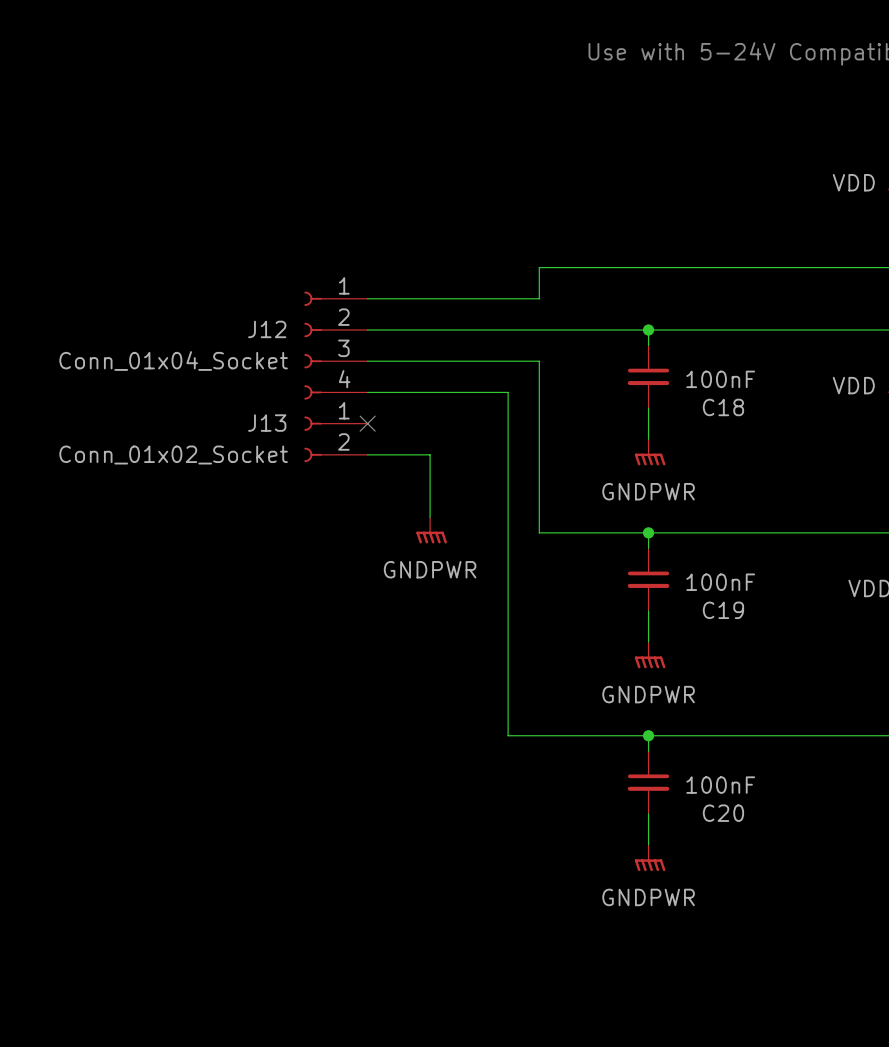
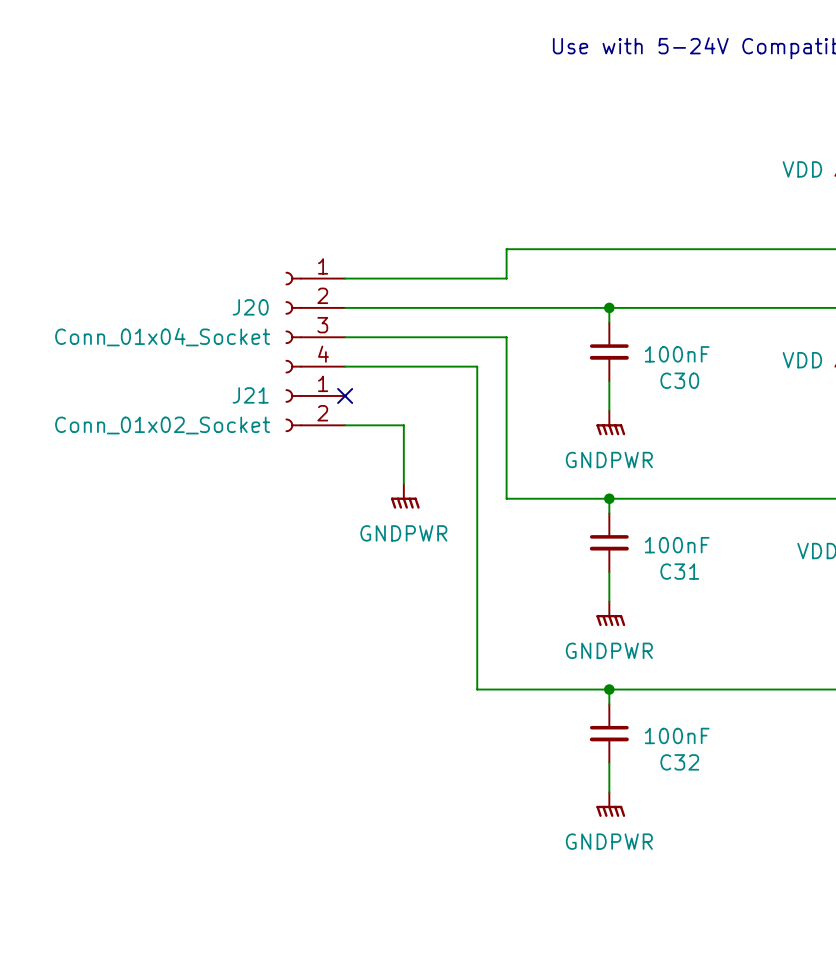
J12 name: J12 (267, 329) -> J20 (250, 307)
C18 name: C18 (723, 407) -> C30 (679, 380)
J13 name: J13 (267, 423) -> J21 (250, 395)
C19 name: C19 (723, 610) -> C31 (679, 571)
C20 name: C20 (723, 813) -> C32 (679, 762)

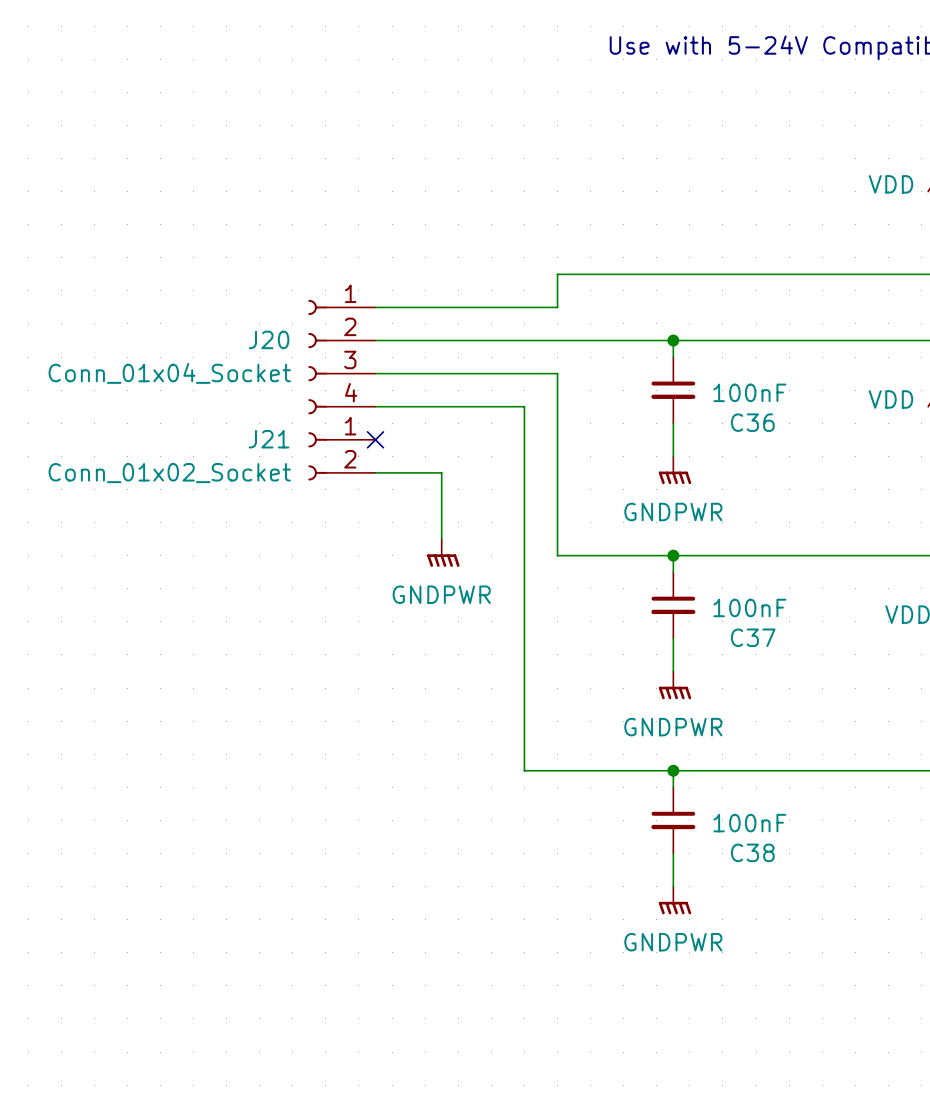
C30 name: C30 (679, 380) -> C36 (752, 422)
C31 name: C31 (679, 571) -> C37 (753, 637)
C32 name: C32 (679, 762) -> C38 (752, 852)

